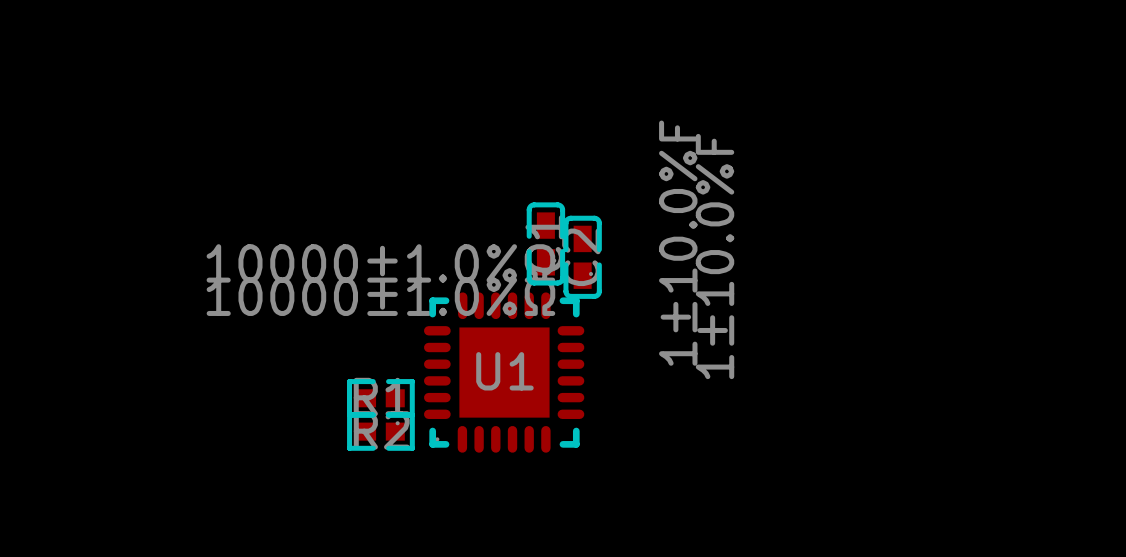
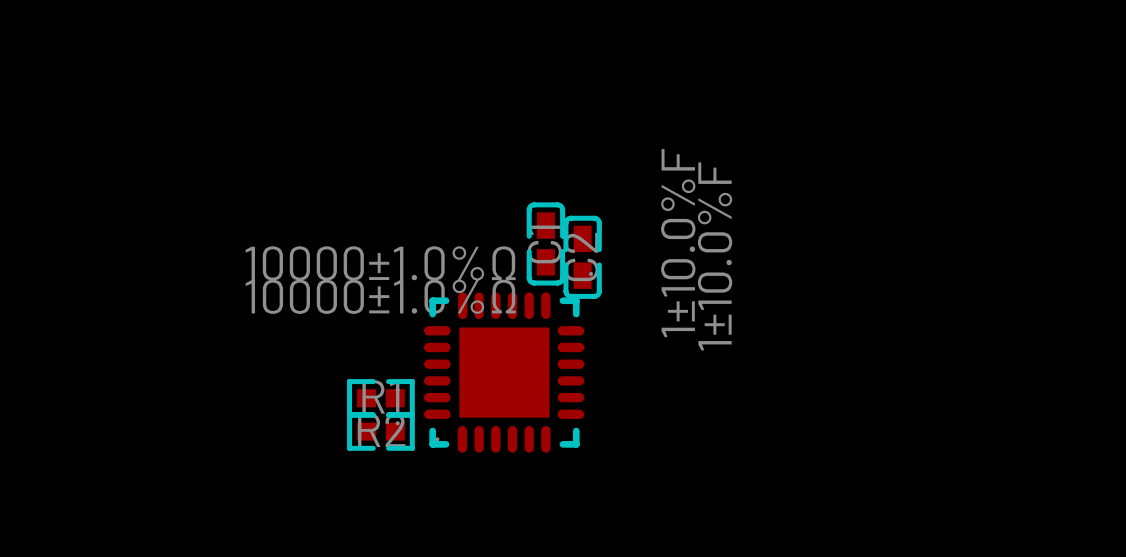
U1 name: U1 (504, 371) -> none

